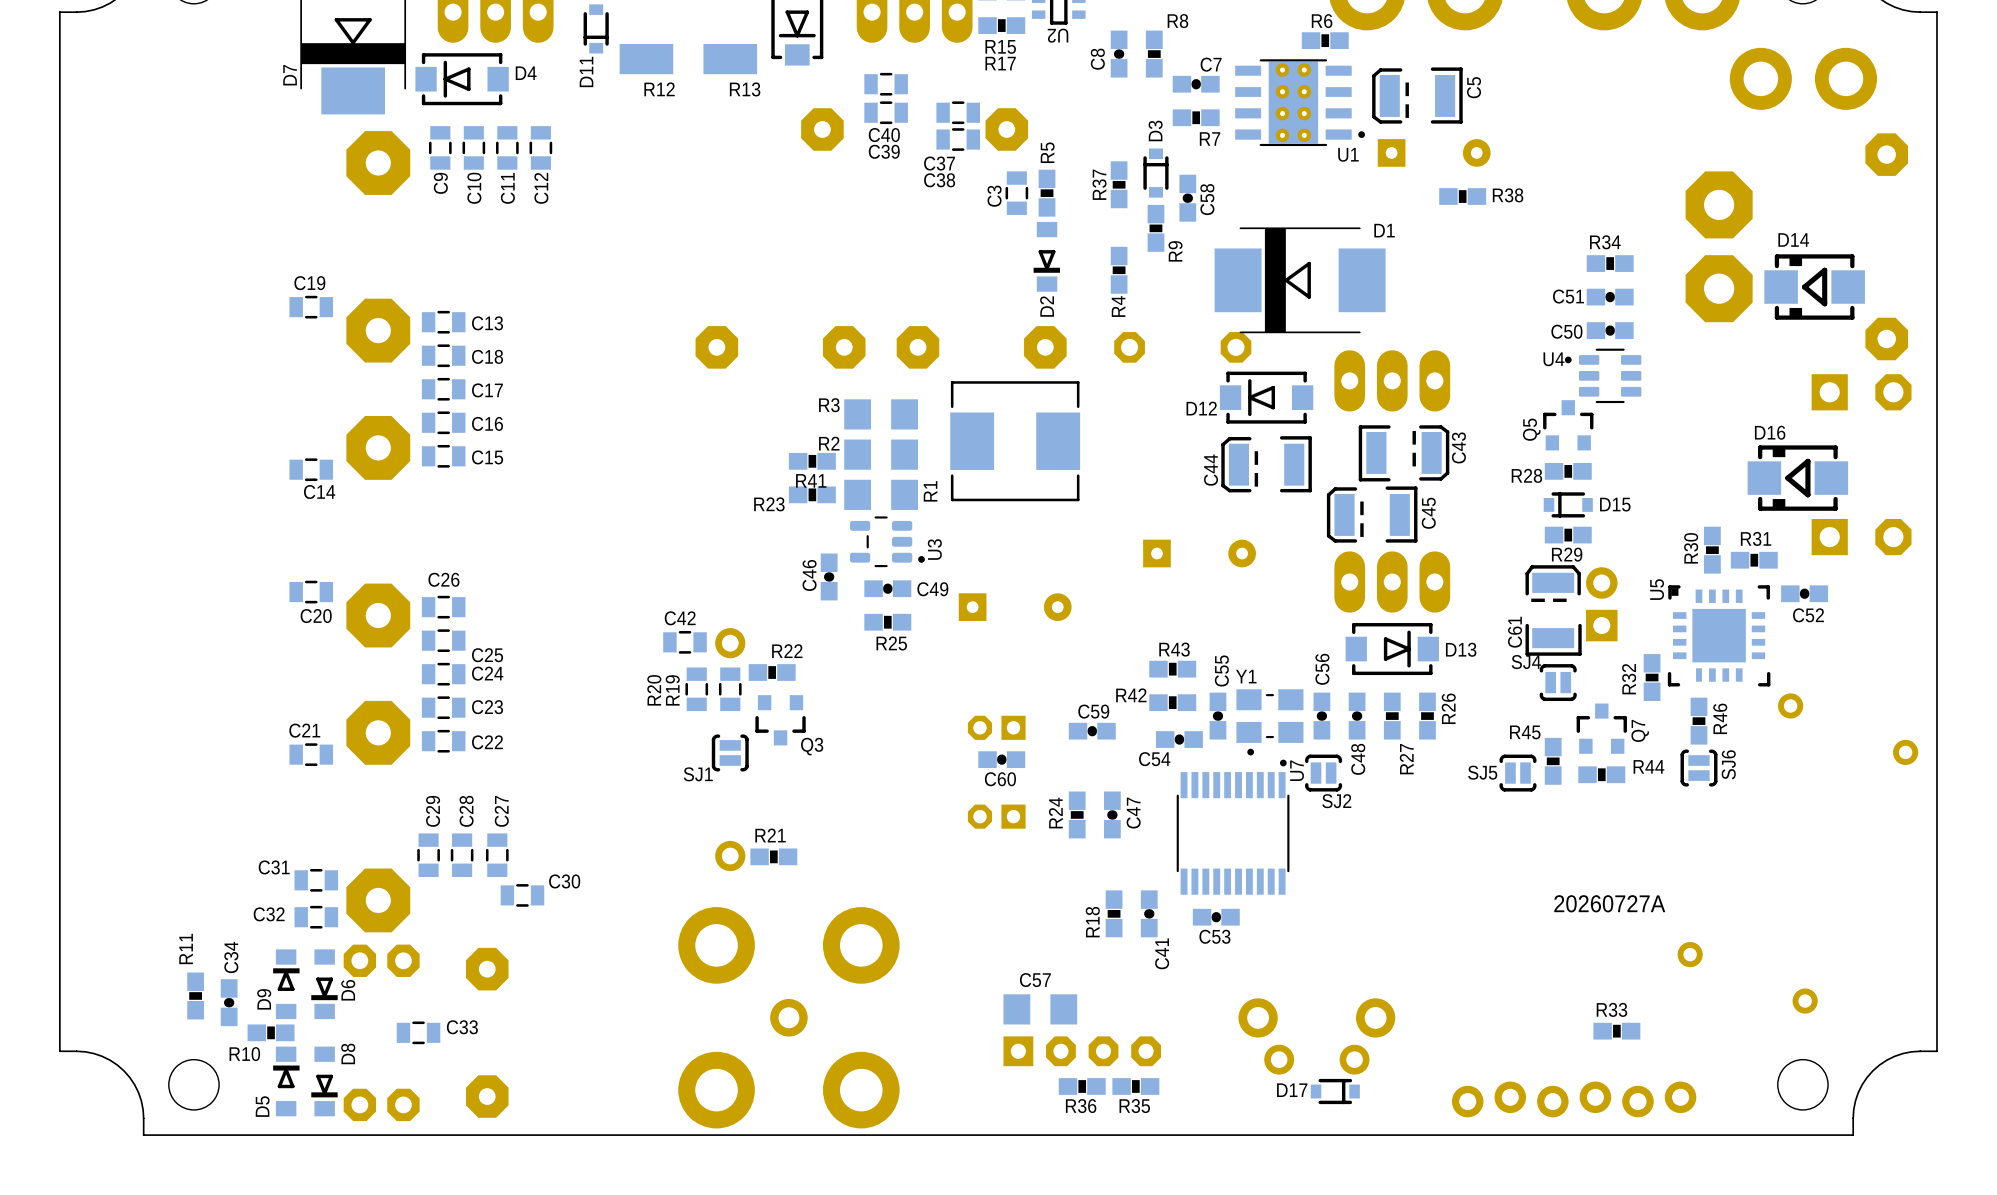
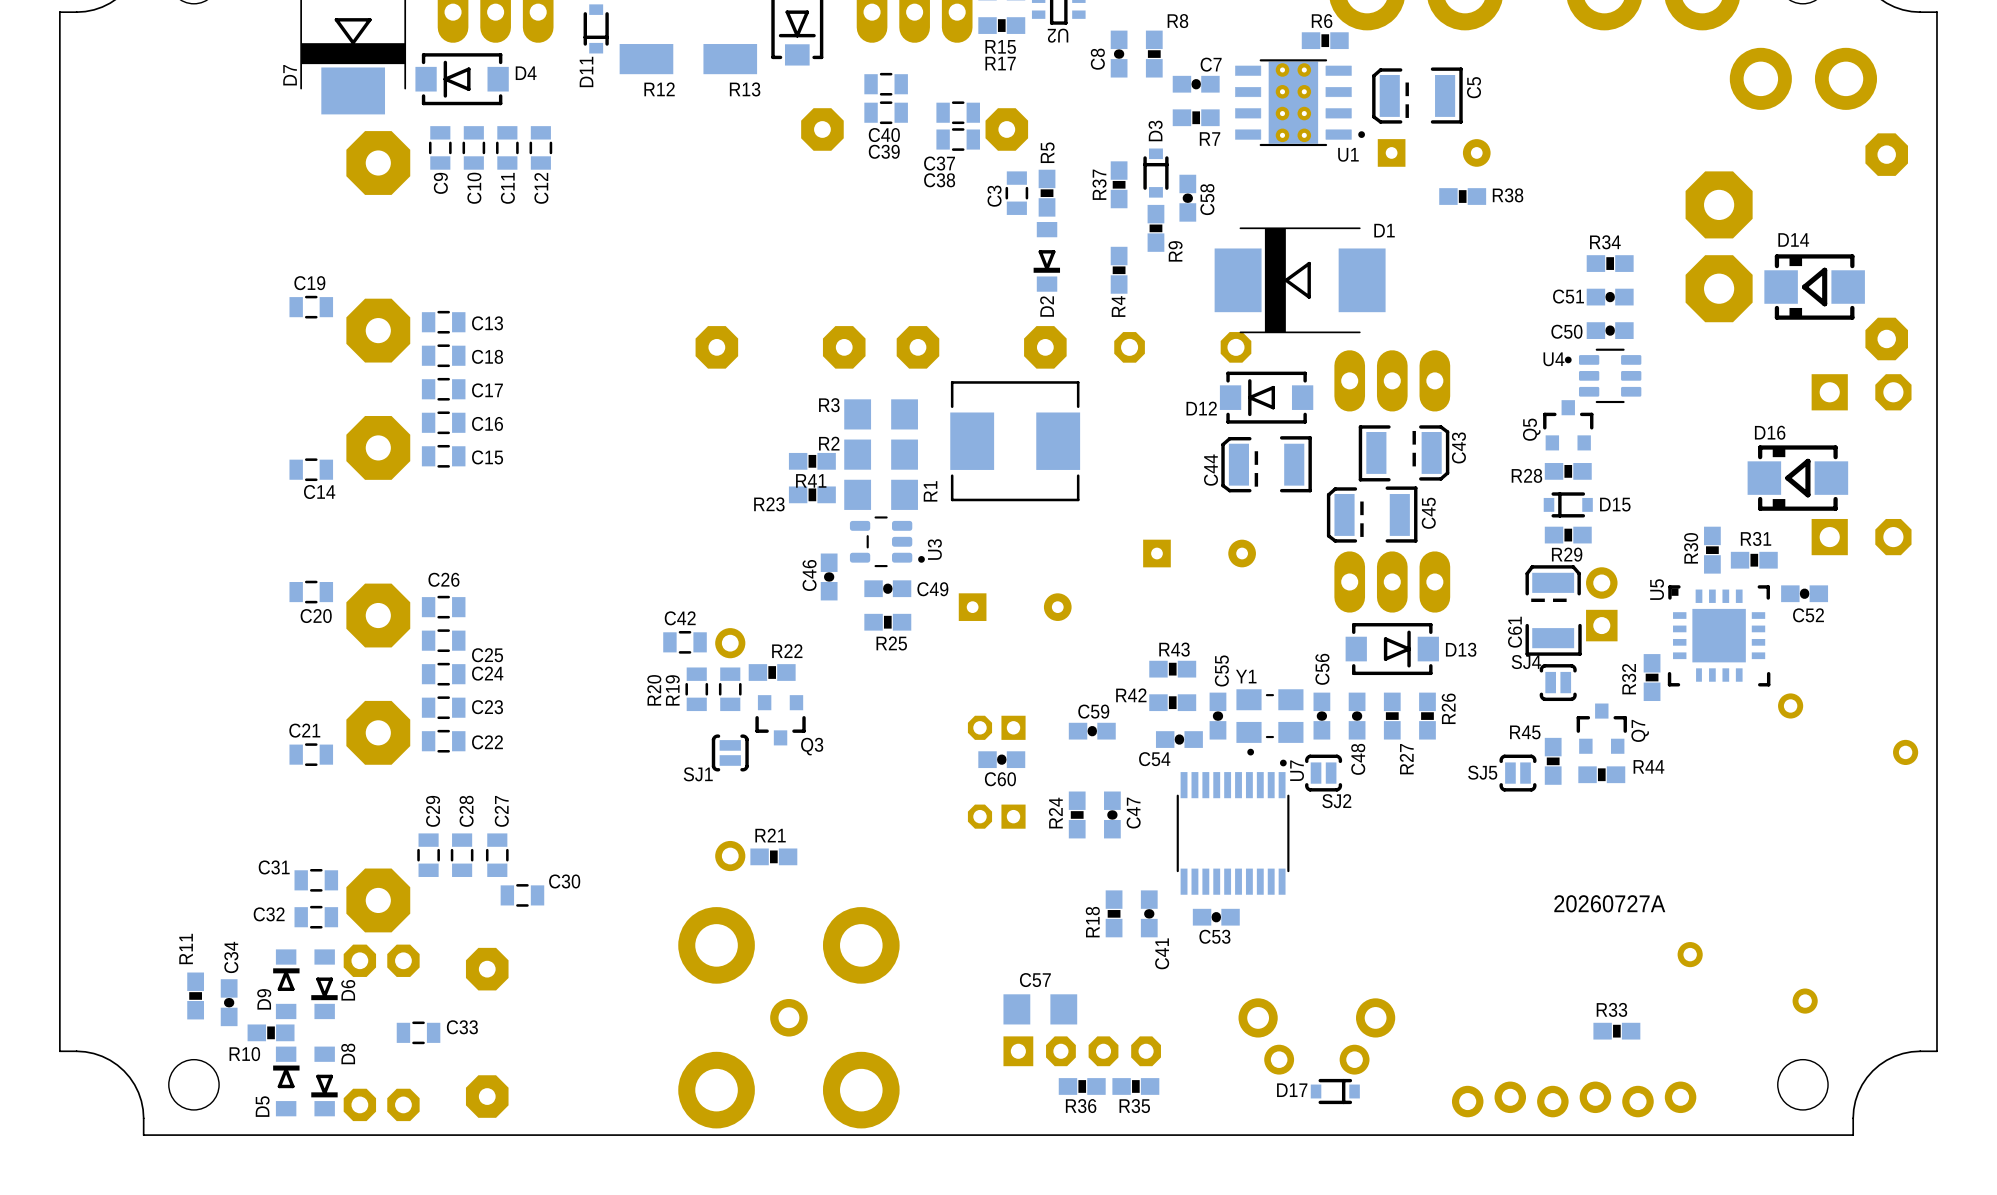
R46: (1698, 721) -> none
SJ6: (1698, 768) -> none

